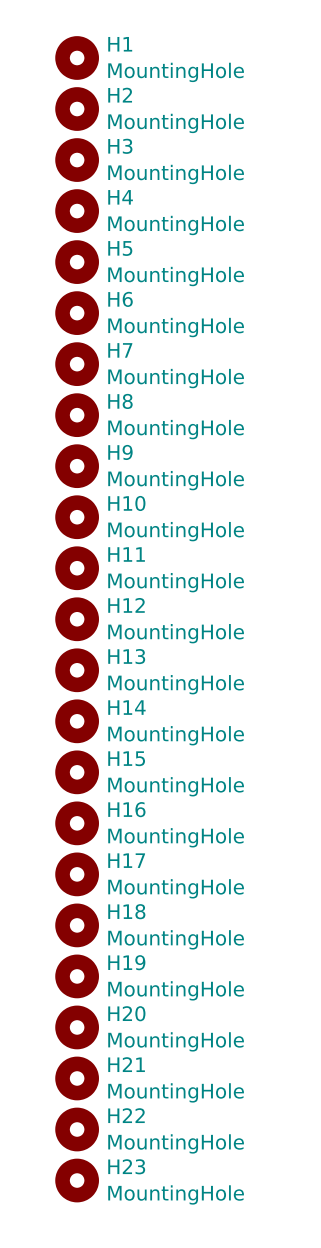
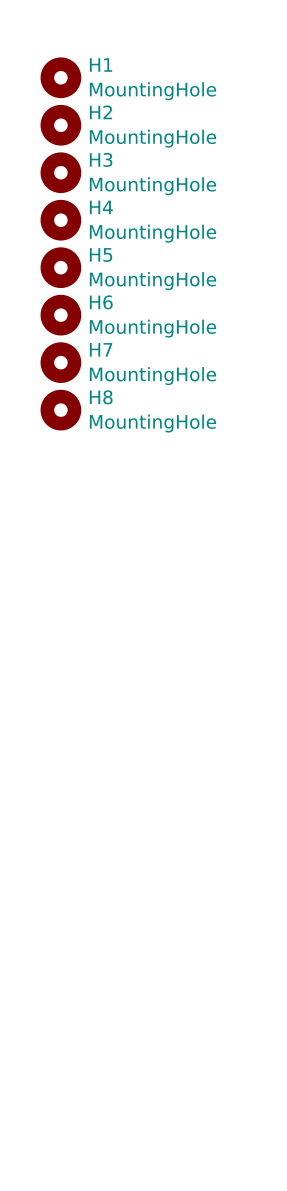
H9: MountingHole (77, 466) -> none
H10: MountingHole (77, 517) -> none
H11: MountingHole (77, 568) -> none
H12: MountingHole (77, 619) -> none
H13: MountingHole (77, 670) -> none
H14: MountingHole (77, 721) -> none
H15: MountingHole (77, 772) -> none
H16: MountingHole (77, 823) -> none
H17: MountingHole (77, 874) -> none
H18: MountingHole (77, 925) -> none
H19: MountingHole (77, 976) -> none
H20: MountingHole (77, 1027) -> none
H21: MountingHole (77, 1078) -> none
H22: MountingHole (77, 1129) -> none
H23: MountingHole (77, 1180) -> none

